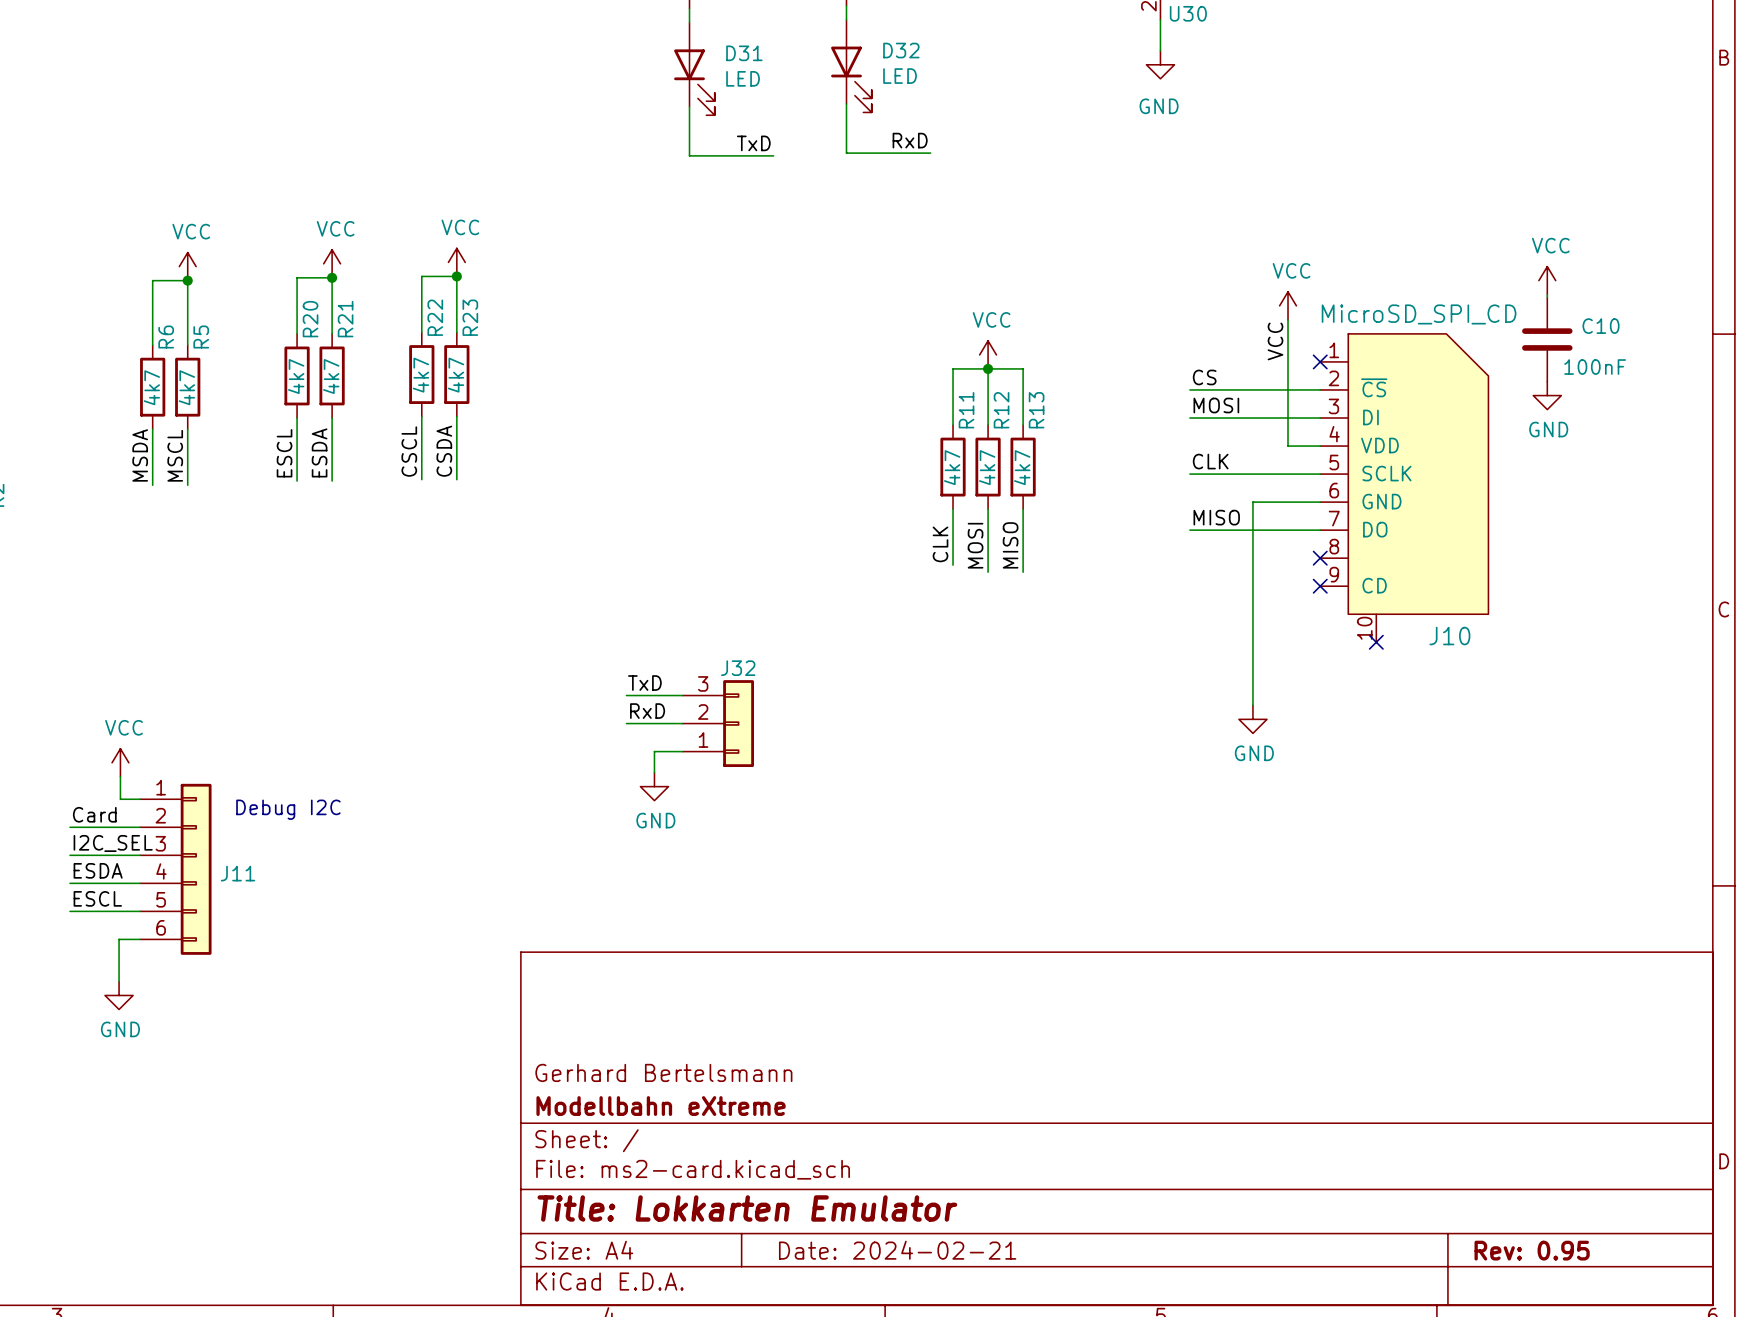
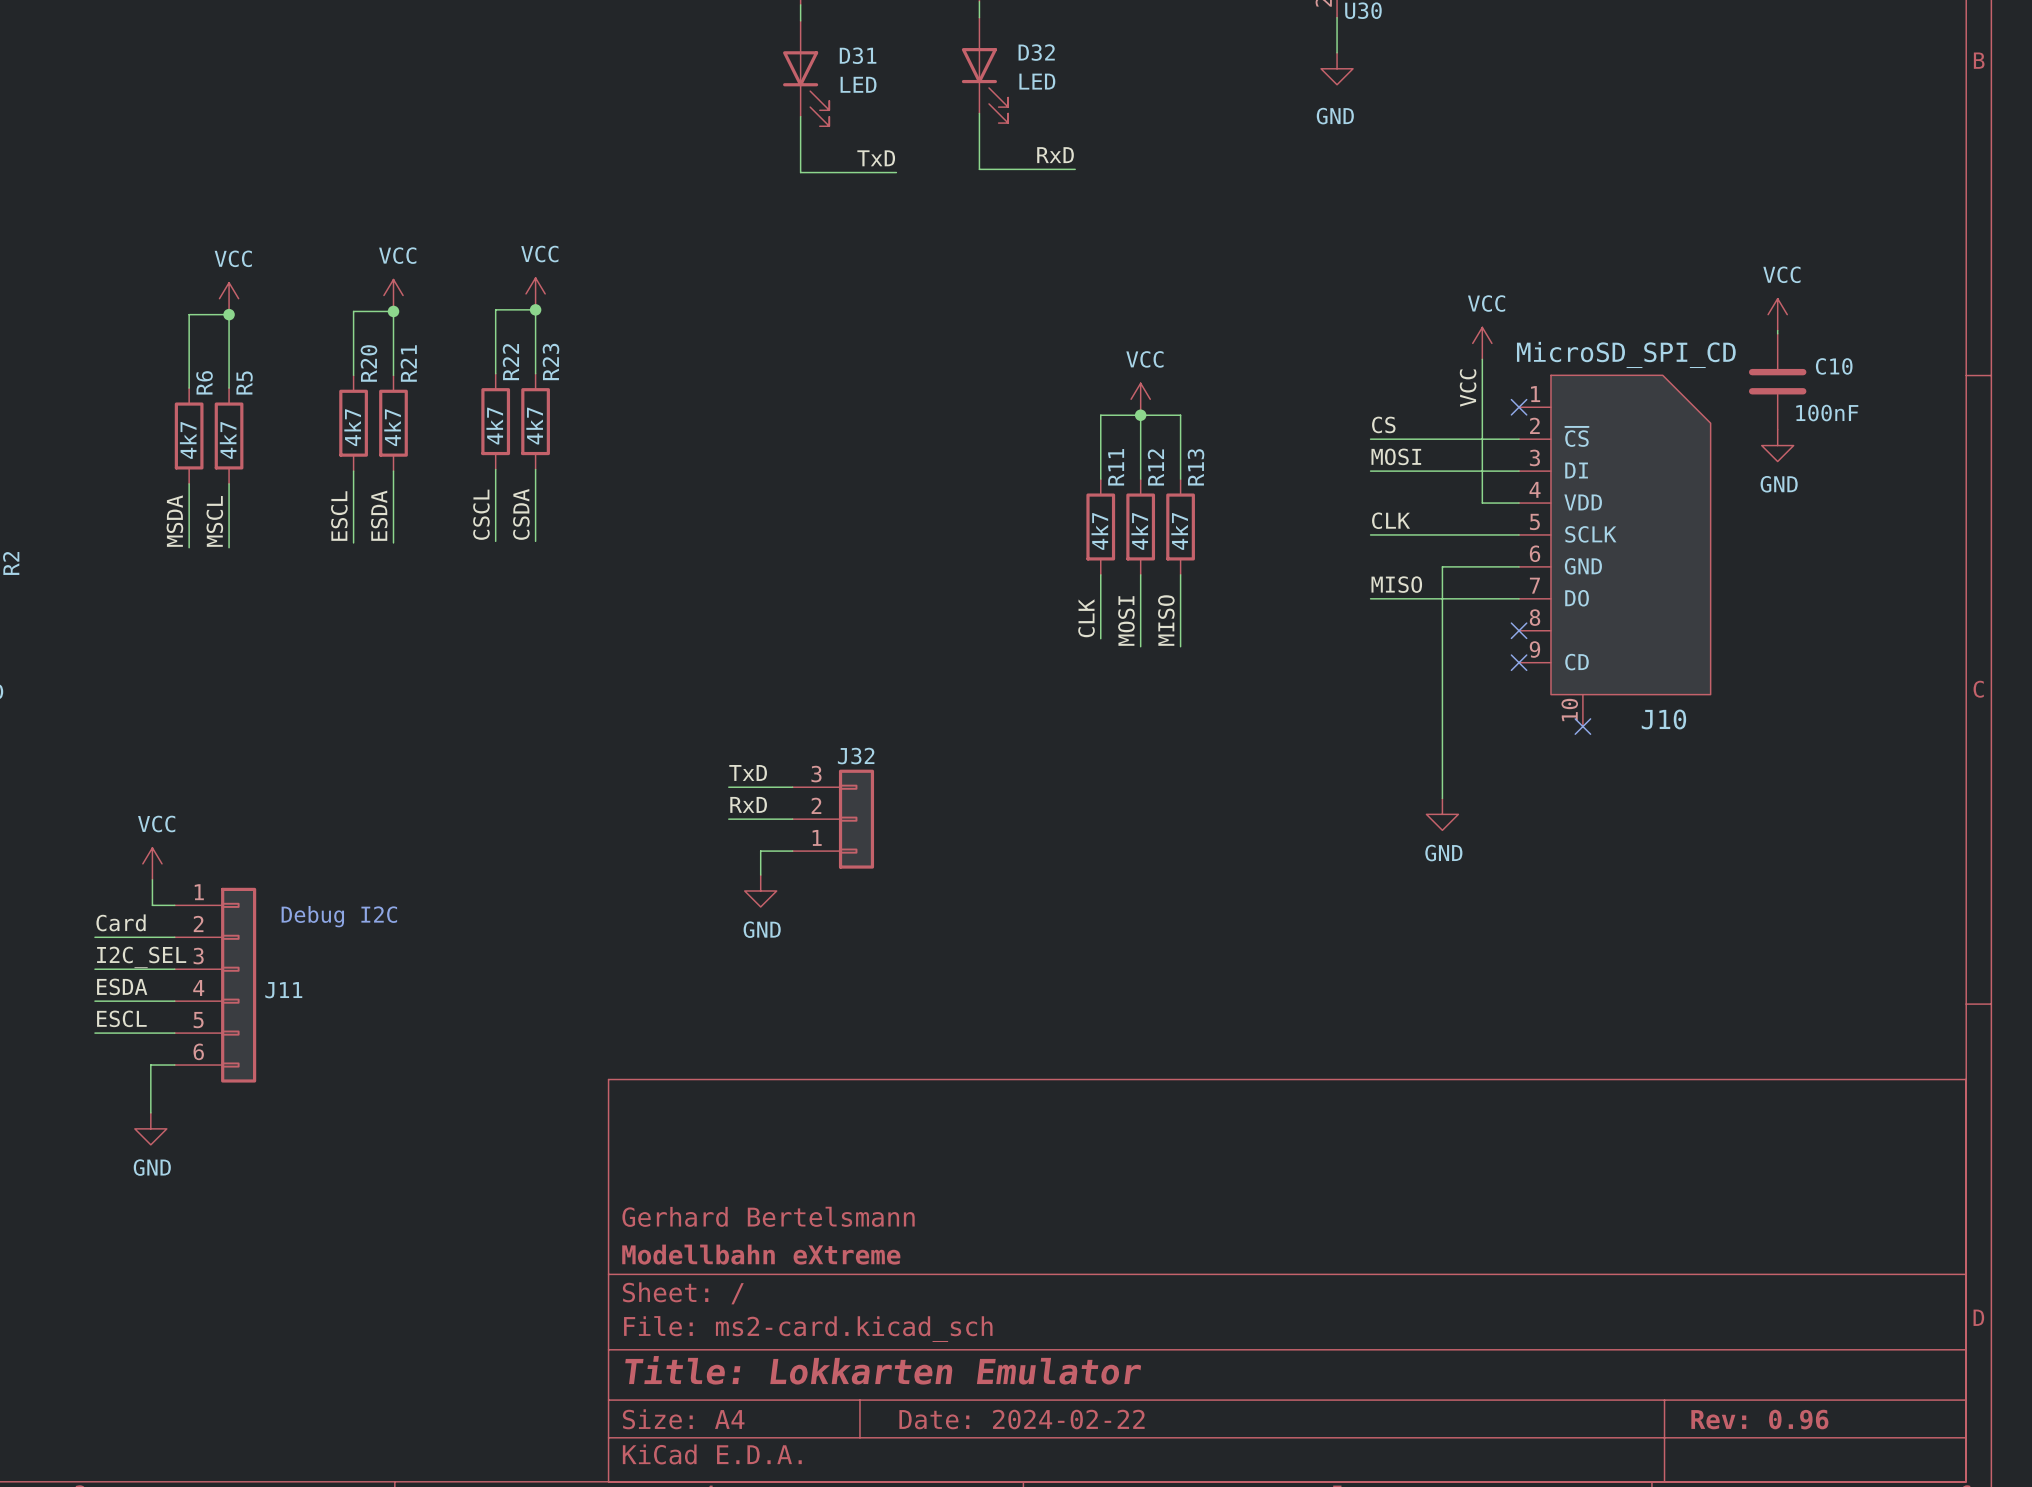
title block: Date: 2024-02-21 (897, 1250) -> Date: 2024-02-22 (1022, 1419)
title block: Rev: 0.95 (1532, 1250) -> Rev: 0.96 (1759, 1419)

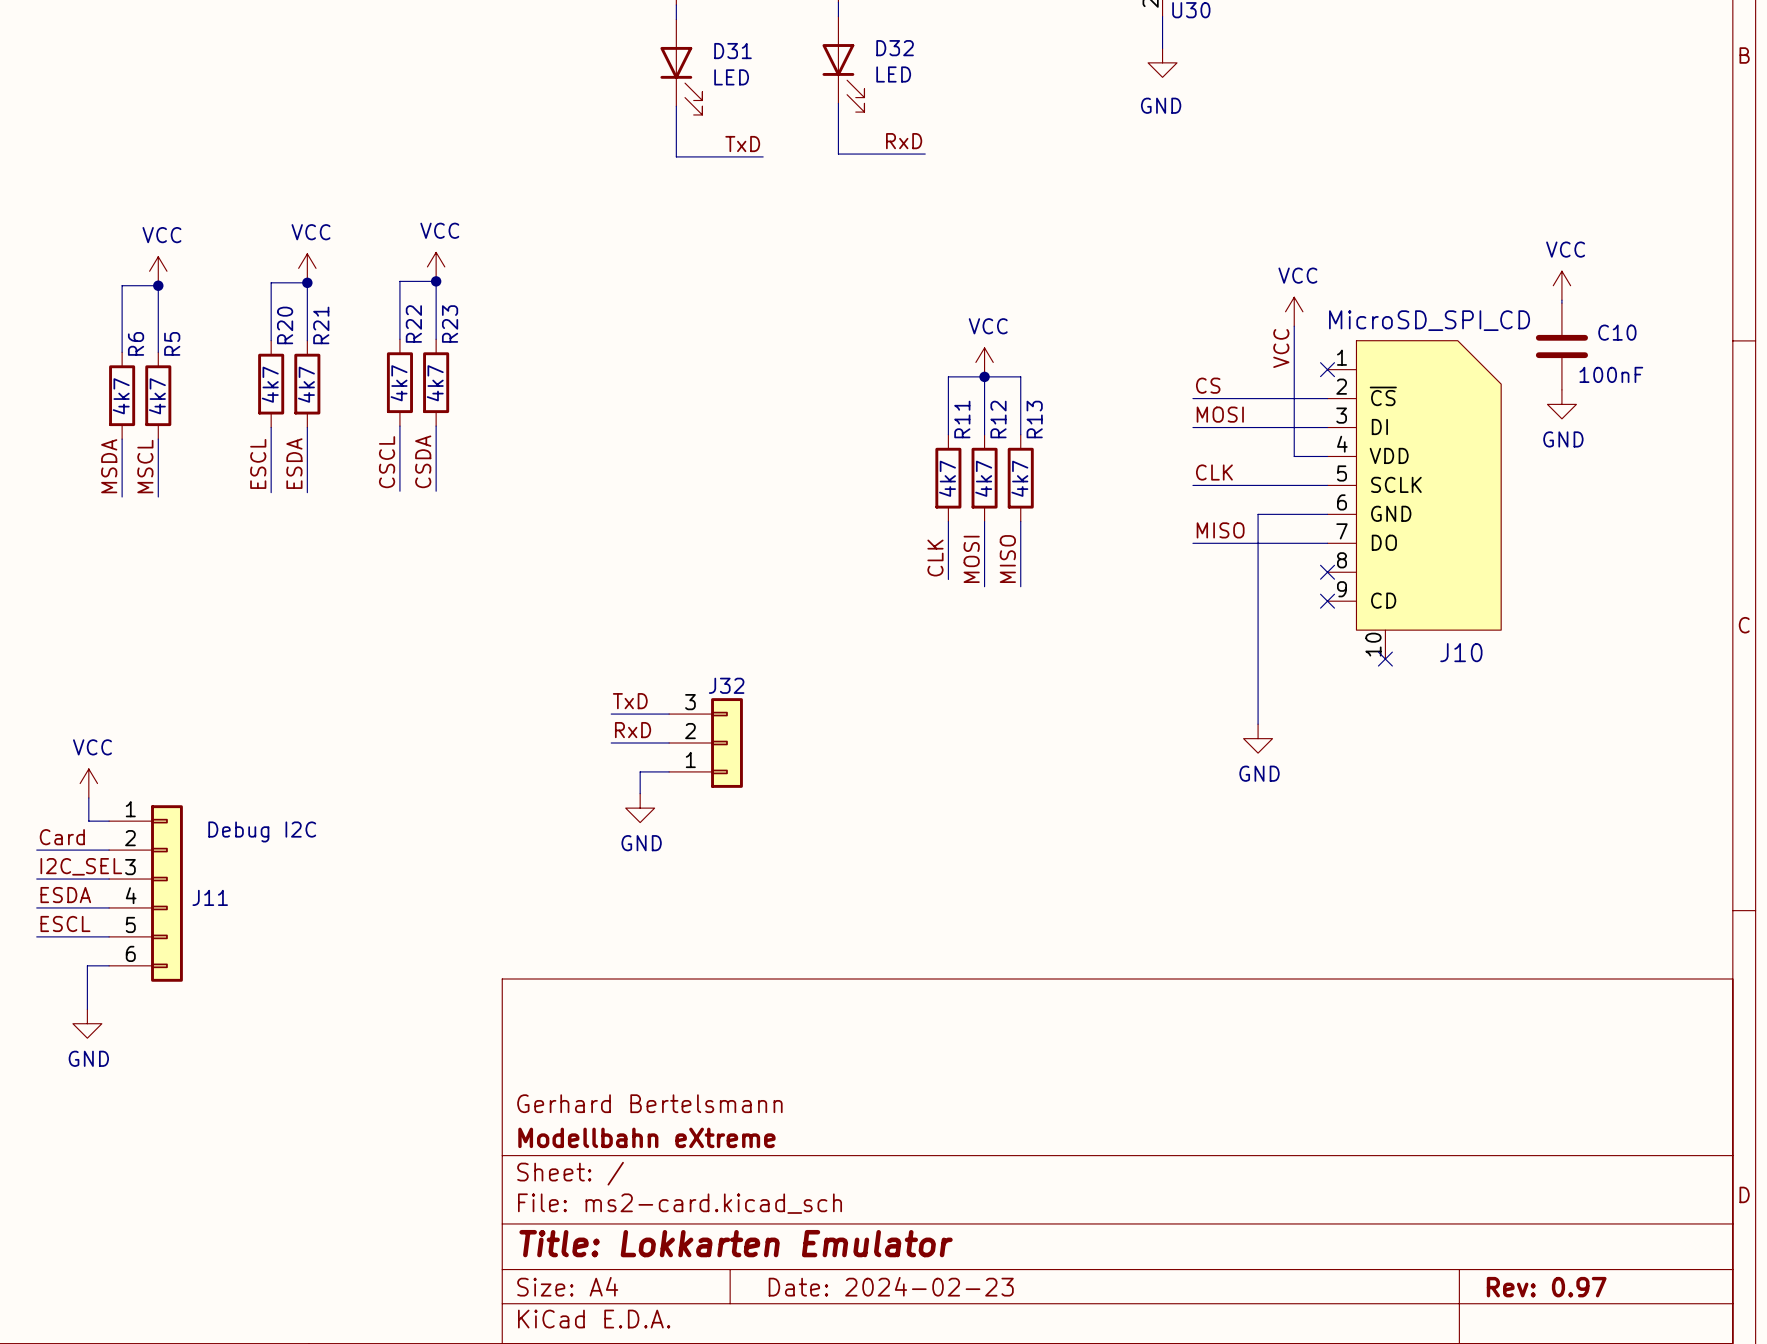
title block: Date: 2024-02-22 (1022, 1419) -> Date: 2024-02-23 (891, 1286)
title block: Rev: 0.96 (1759, 1419) -> Rev: 0.97 (1546, 1287)

